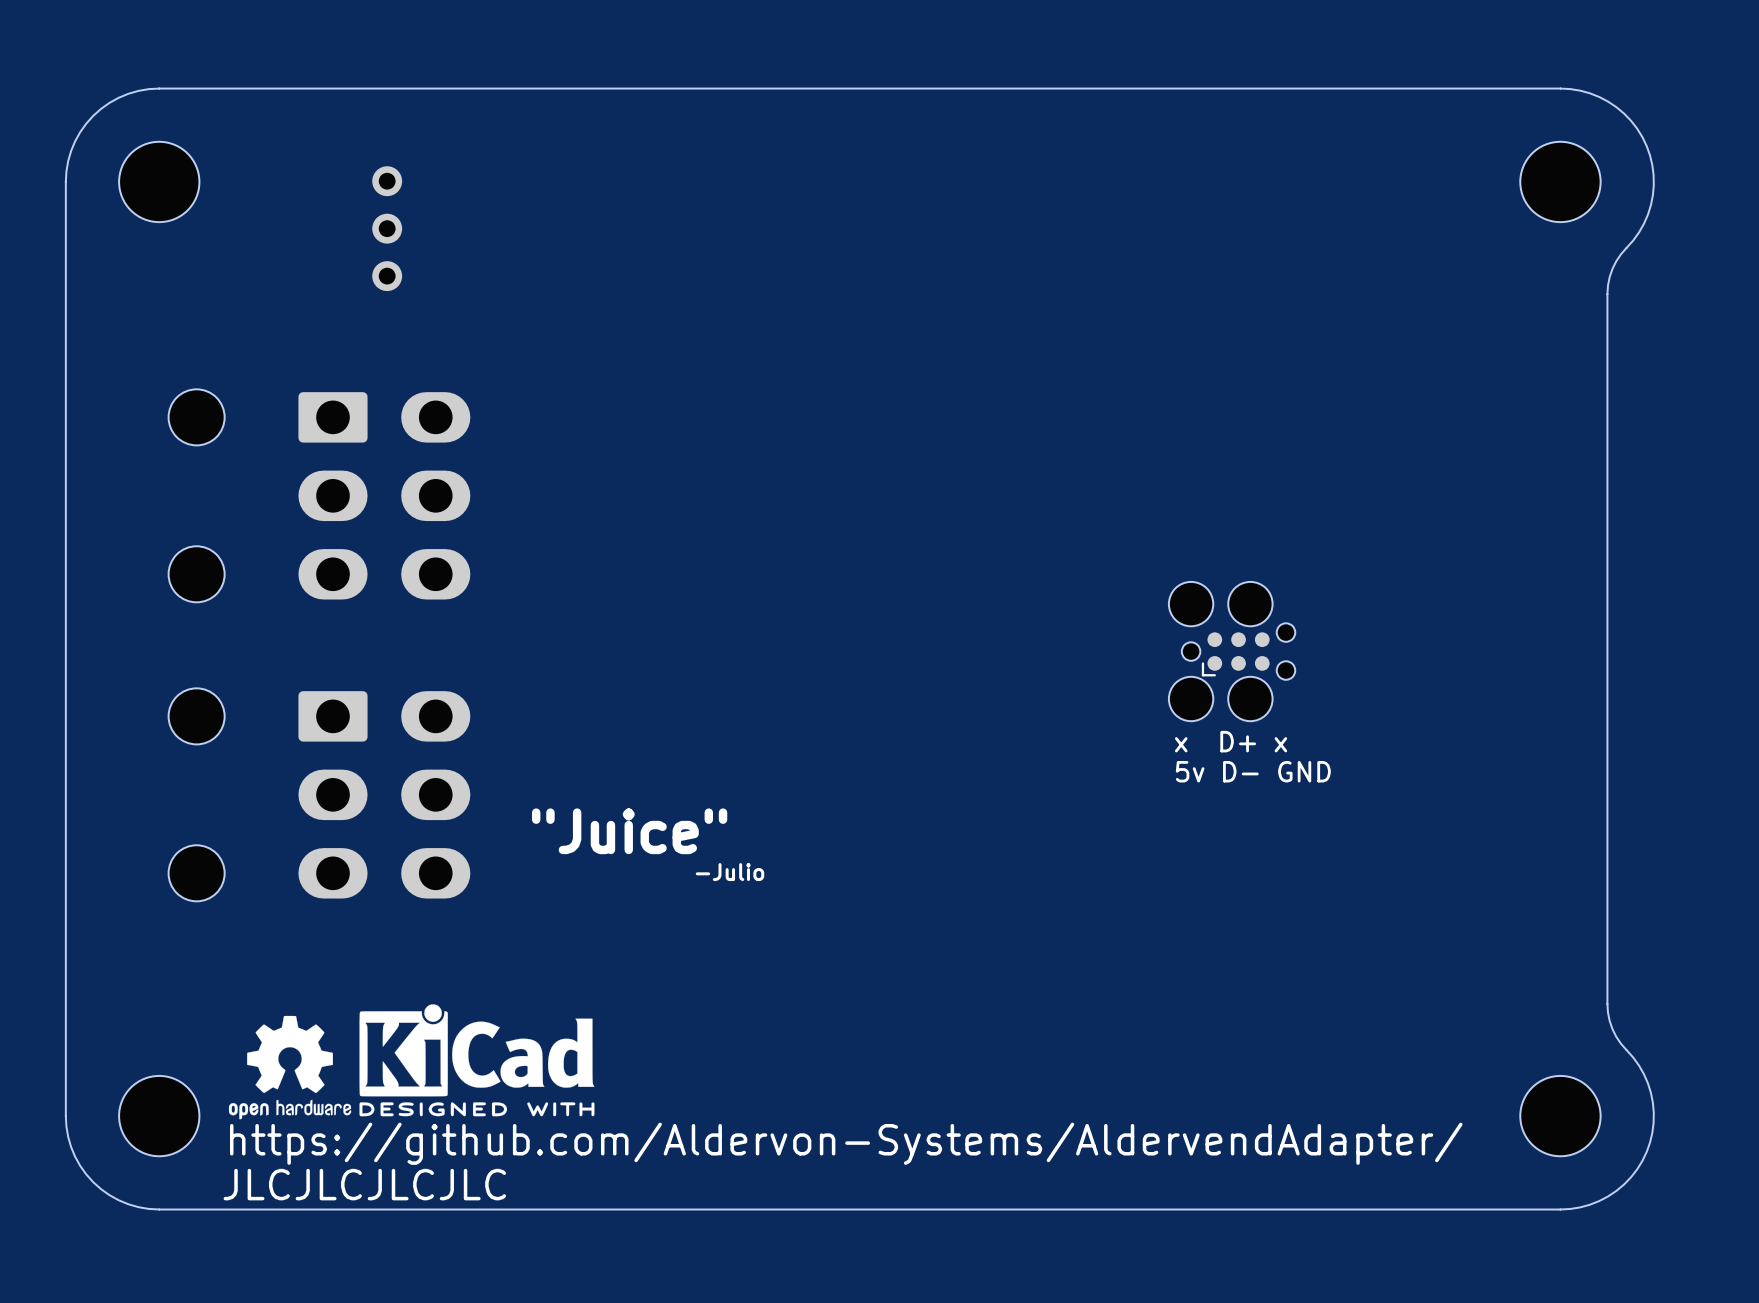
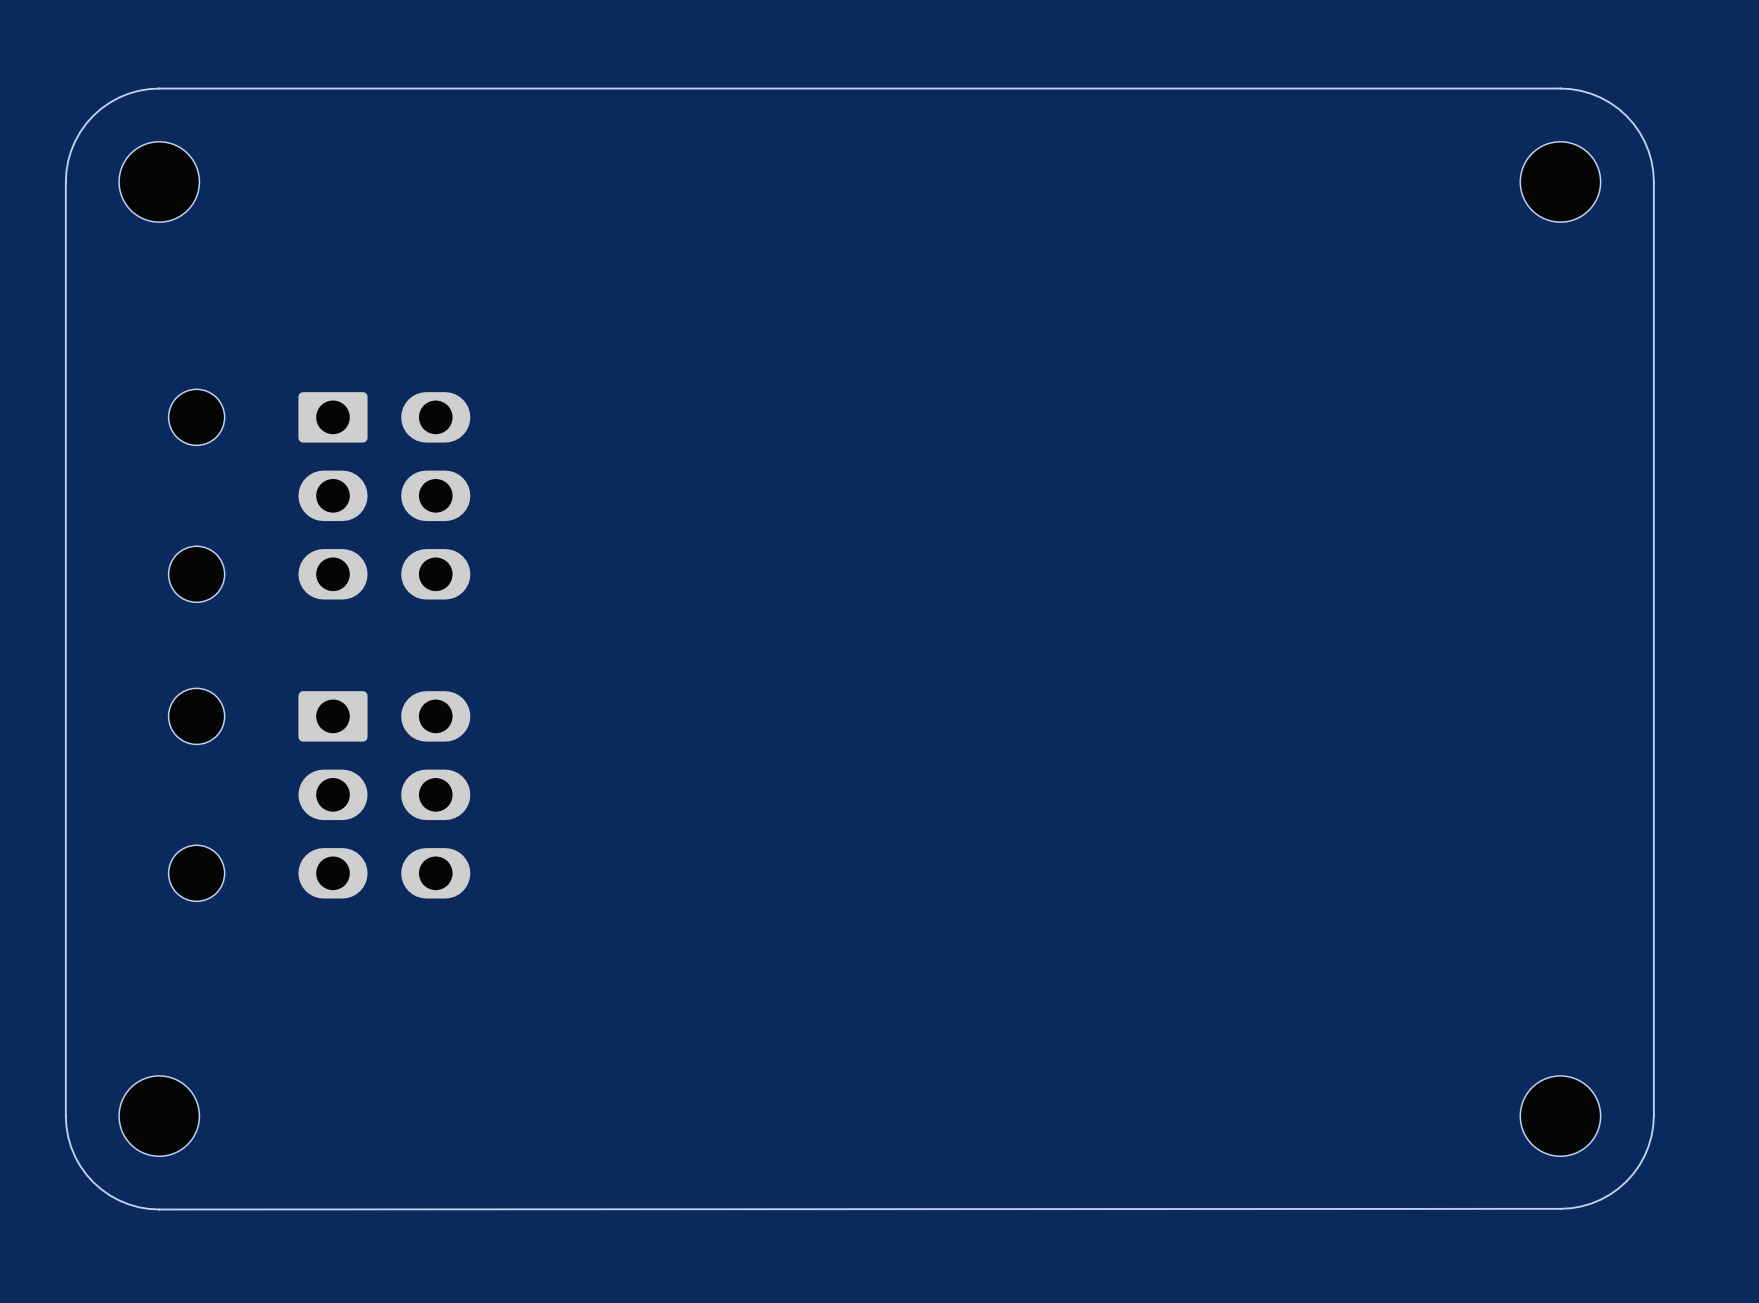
board edge: (1560, 88) (1580, 90) (1599, 96) (1624, 113) (1642, 137) (1650, 155) (1653, 175) (1652, 195) (1647, 214) (1639, 232) (1616, 261) (1609, 277) (1607, 294) (1607, 1003) (1609, 1020) (1616, 1036) (1639, 1065) (1647, 1083) (1653, 1112) (1652, 1132) (1646, 1151) (1637, 1169) (1616, 1190) (1589, 1204) (1560, 1209) (159, 1209) -> (1560, 88) (1591, 93) (1610, 102) (1626, 115) (1639, 132) (1648, 151) (1653, 181) (1653, 1115) (1651, 1136) (1644, 1155) (1633, 1173) (1618, 1188) (1591, 1203) (1560, 1208) (159, 1209)
part: (387, 228) -> none
part: (1232, 651) -> none
text: x D+ x (1231, 741) -> none
text: 5v D- GND (1253, 771) -> none
text: "Juice" (629, 831) -> none
text: -Julio (729, 872) -> none
drawing: [228, 1004, 595, 1120] -> none
text: https://github.com/Aldervon-Systems/AldervendAdapter/ (846, 1143) -> none
text: JLCJLCJLCJLC (364, 1184) -> none

